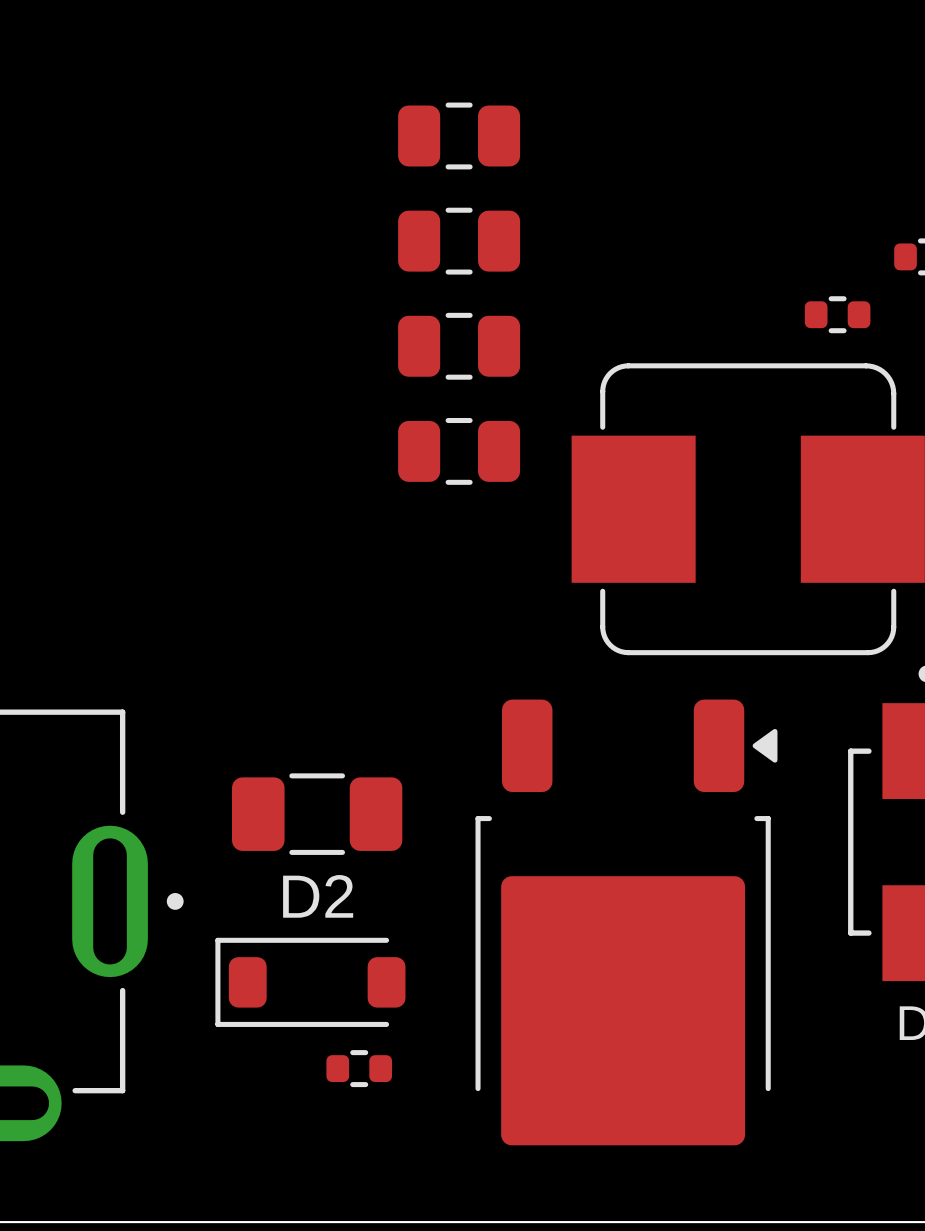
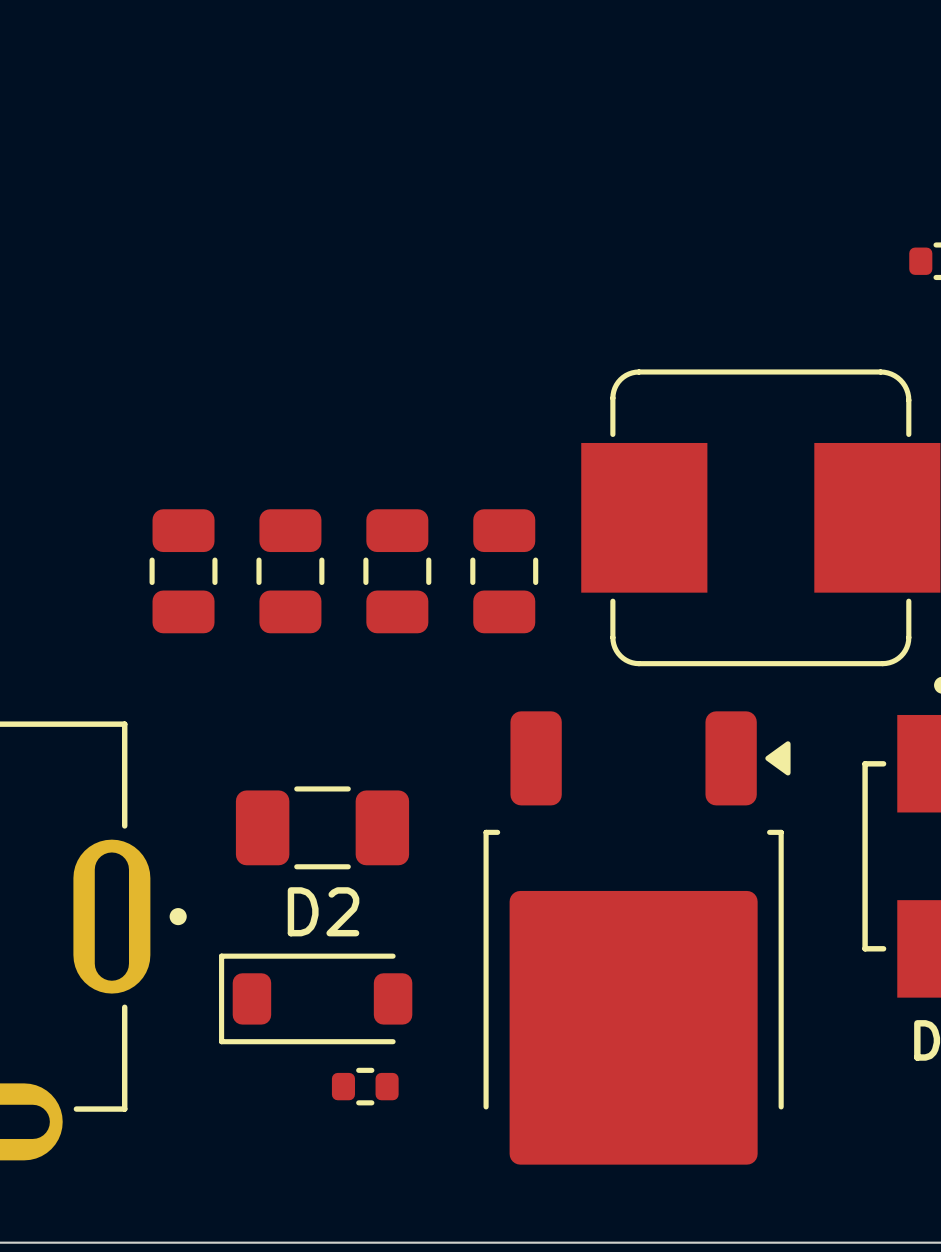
part: (459, 135) -> none
part: (459, 241) -> none
part: (837, 314) -> none
part: (459, 346) -> none
part: (459, 451) -> none
part: none -> (183, 571)
part: none -> (290, 571)
part: none -> (397, 571)
part: none -> (504, 571)

